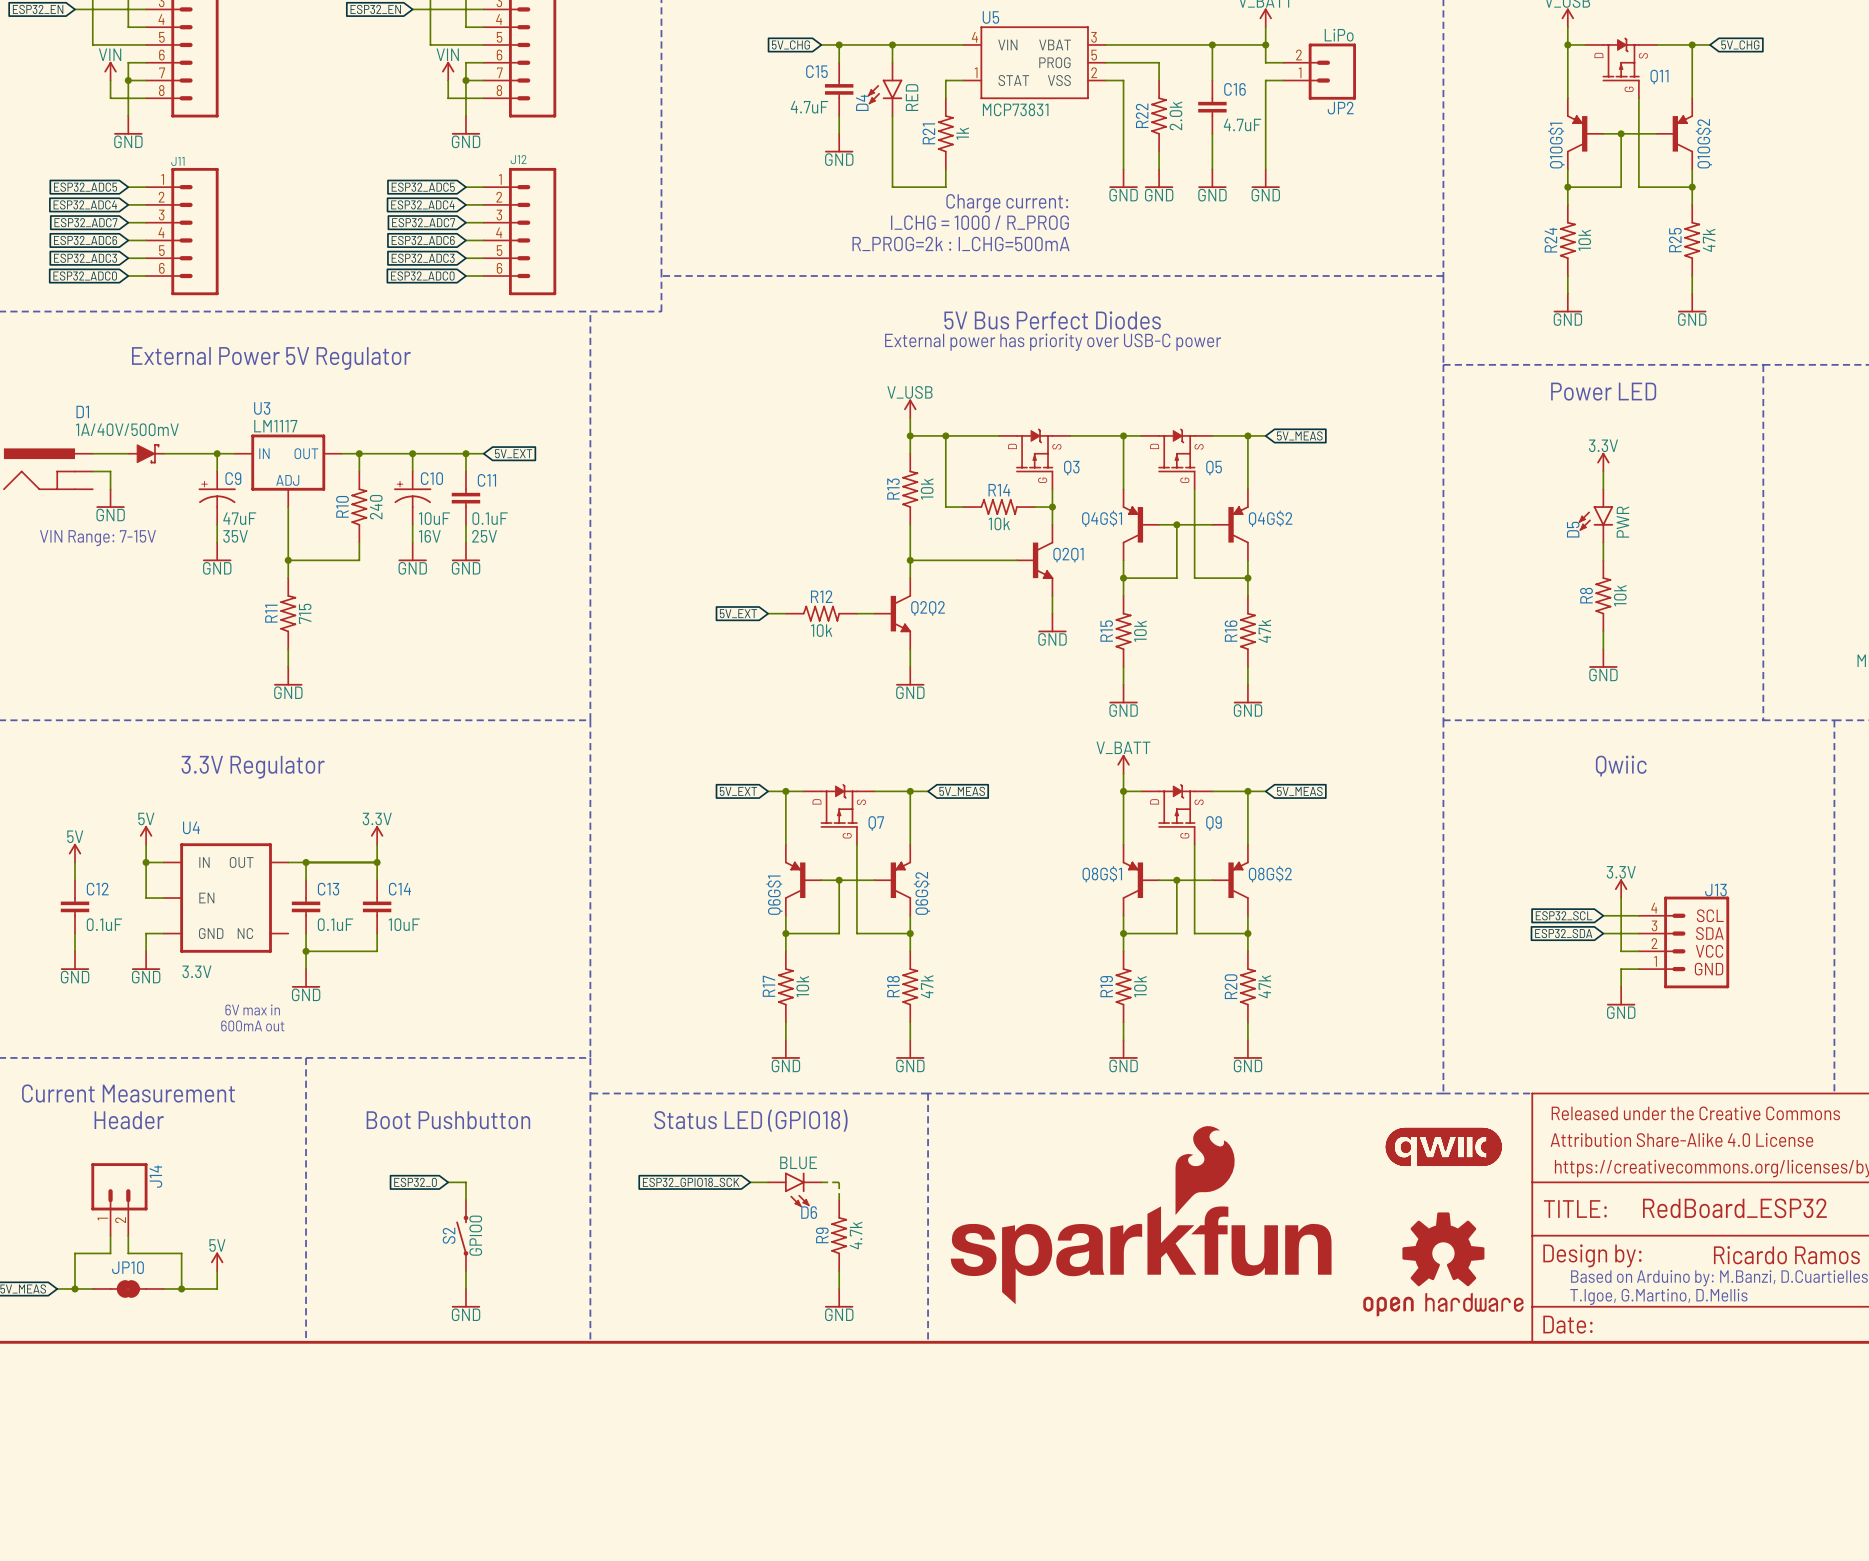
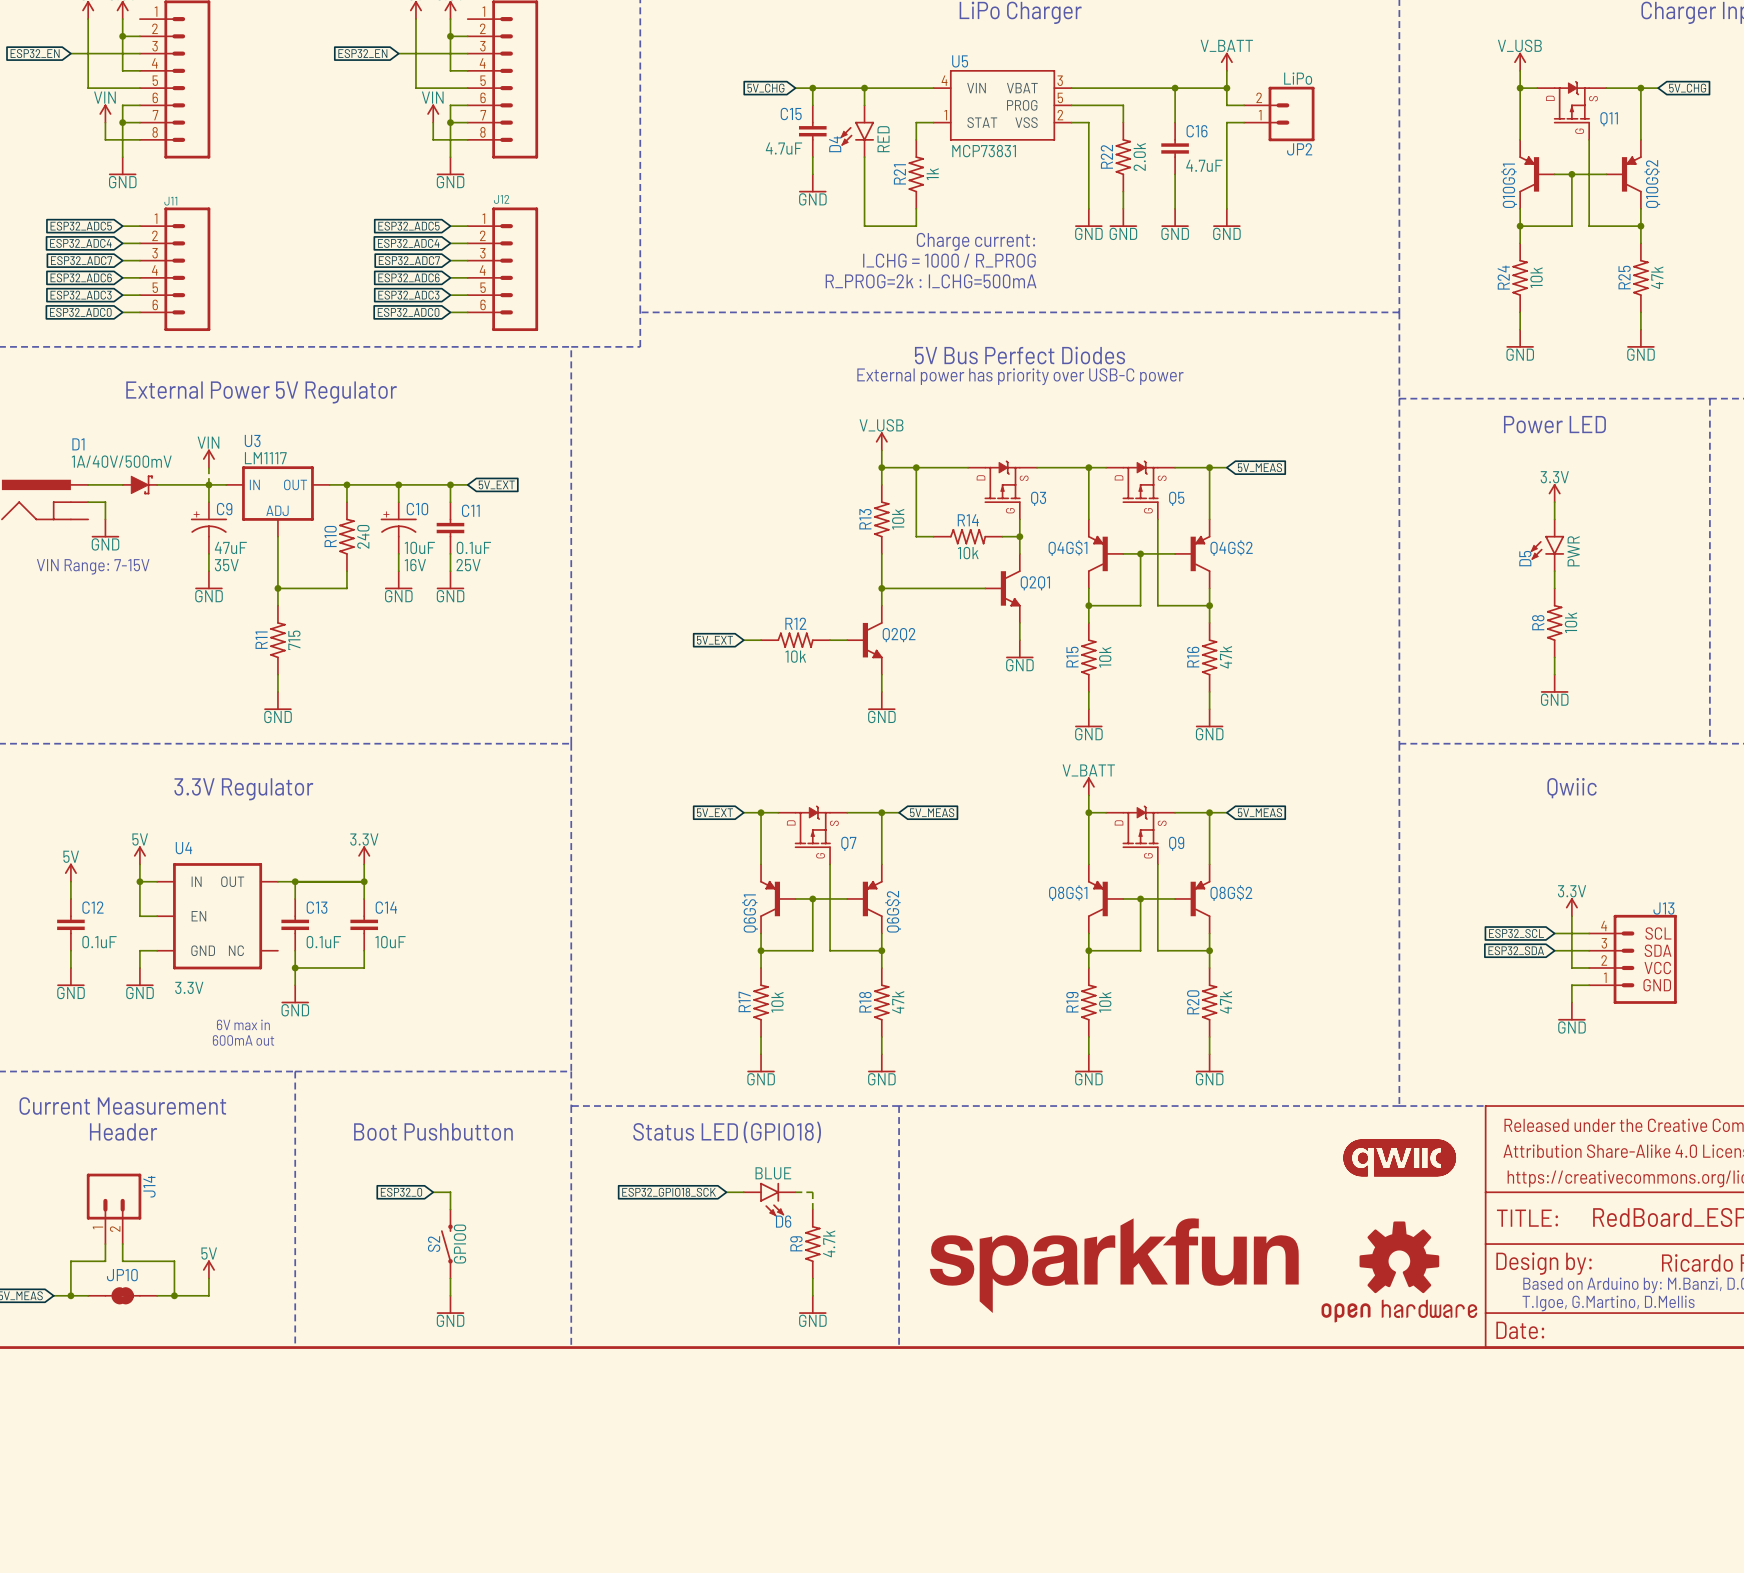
power symbol: none -> VIN (208, 458)
wire: none -> (208, 467) (208, 484)
part: (1141, 1215) -> none
part: none -> (1114, 1265)

